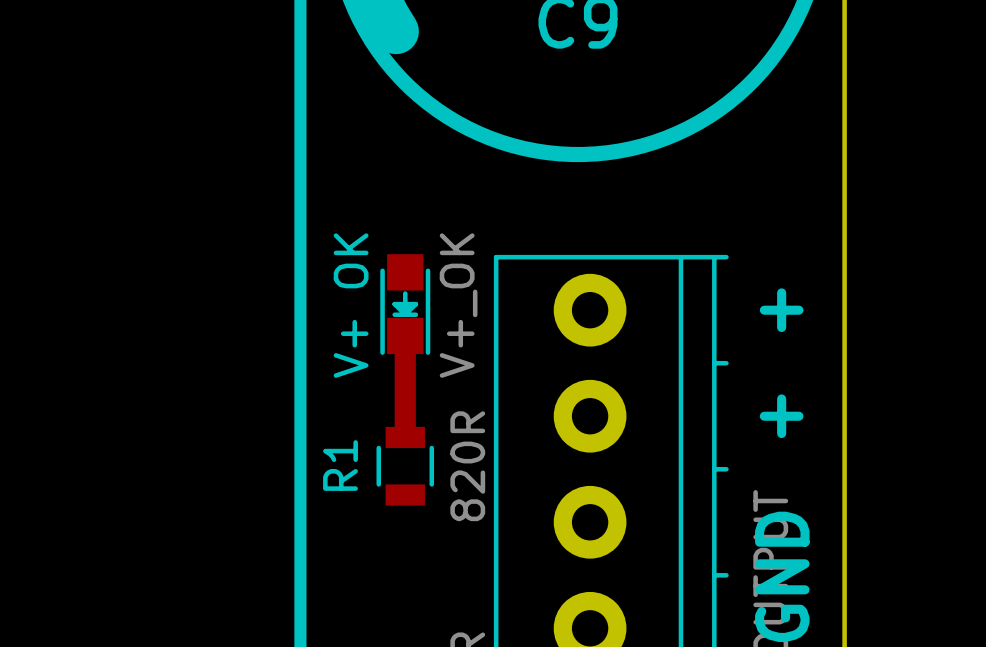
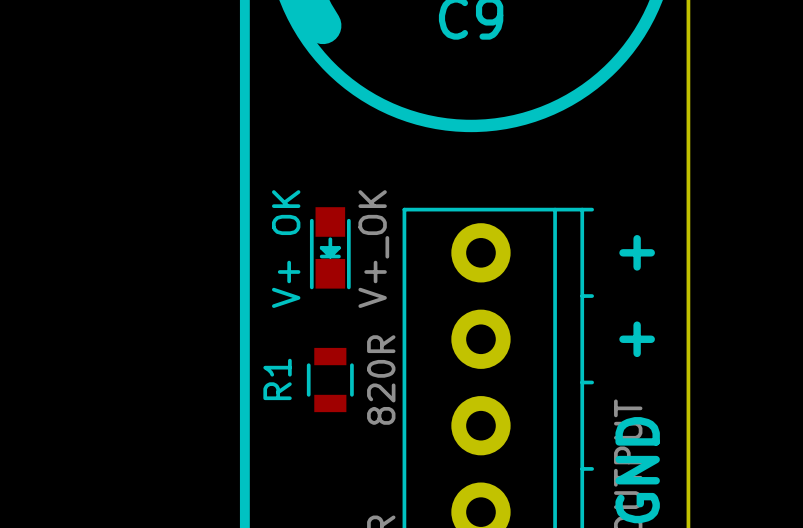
top track: (405, 335) (405, 437) -> none

